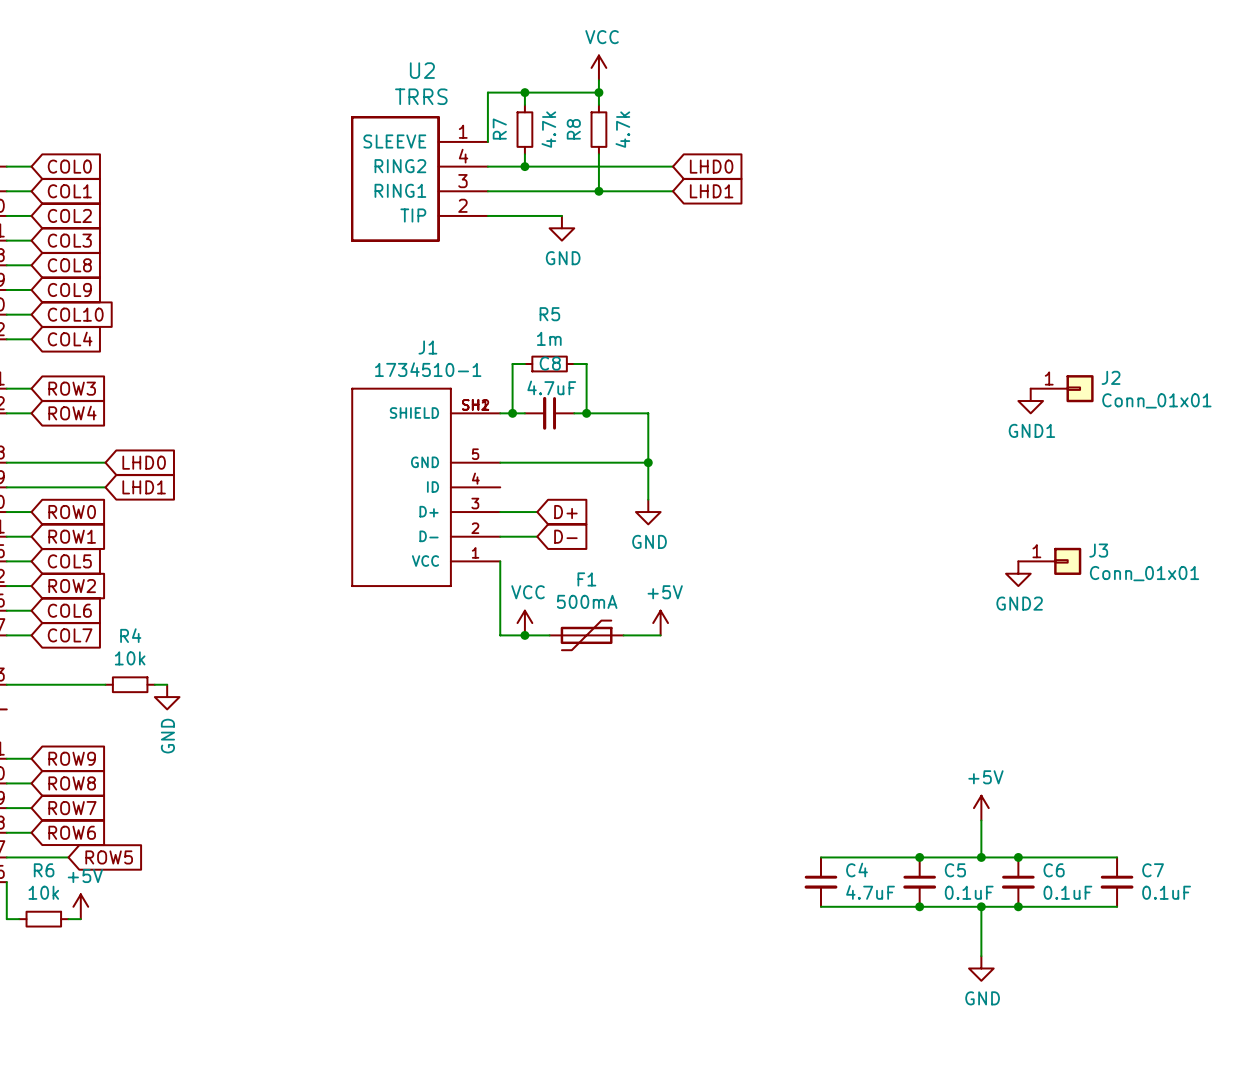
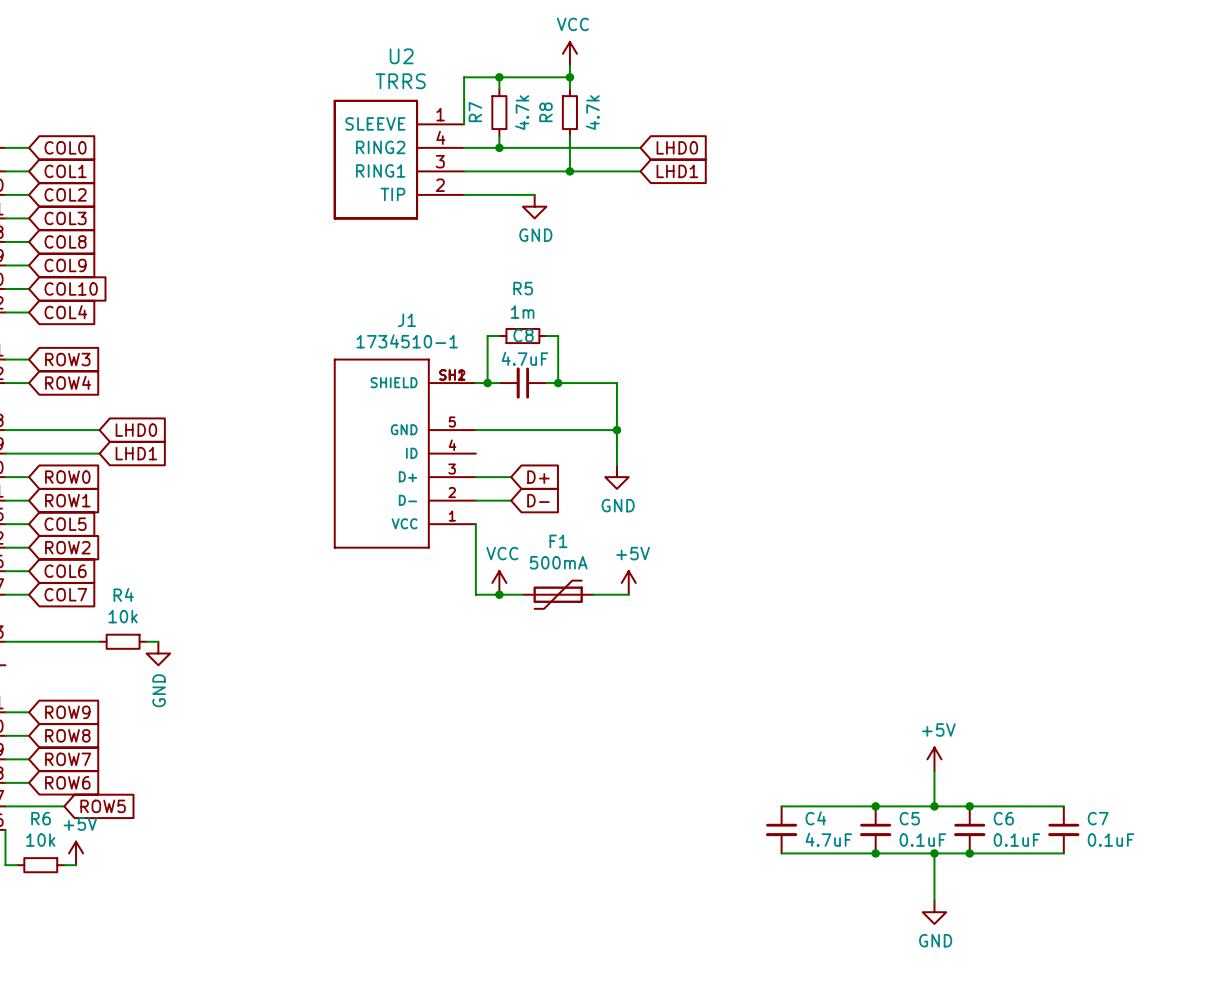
J2: Conn_01x01 (1062, 388) -> none
power symbol: GND1 (1030, 401) -> none
J3: Conn_01x01 (1049, 561) -> none
power symbol: GND2 (1018, 573) -> none

